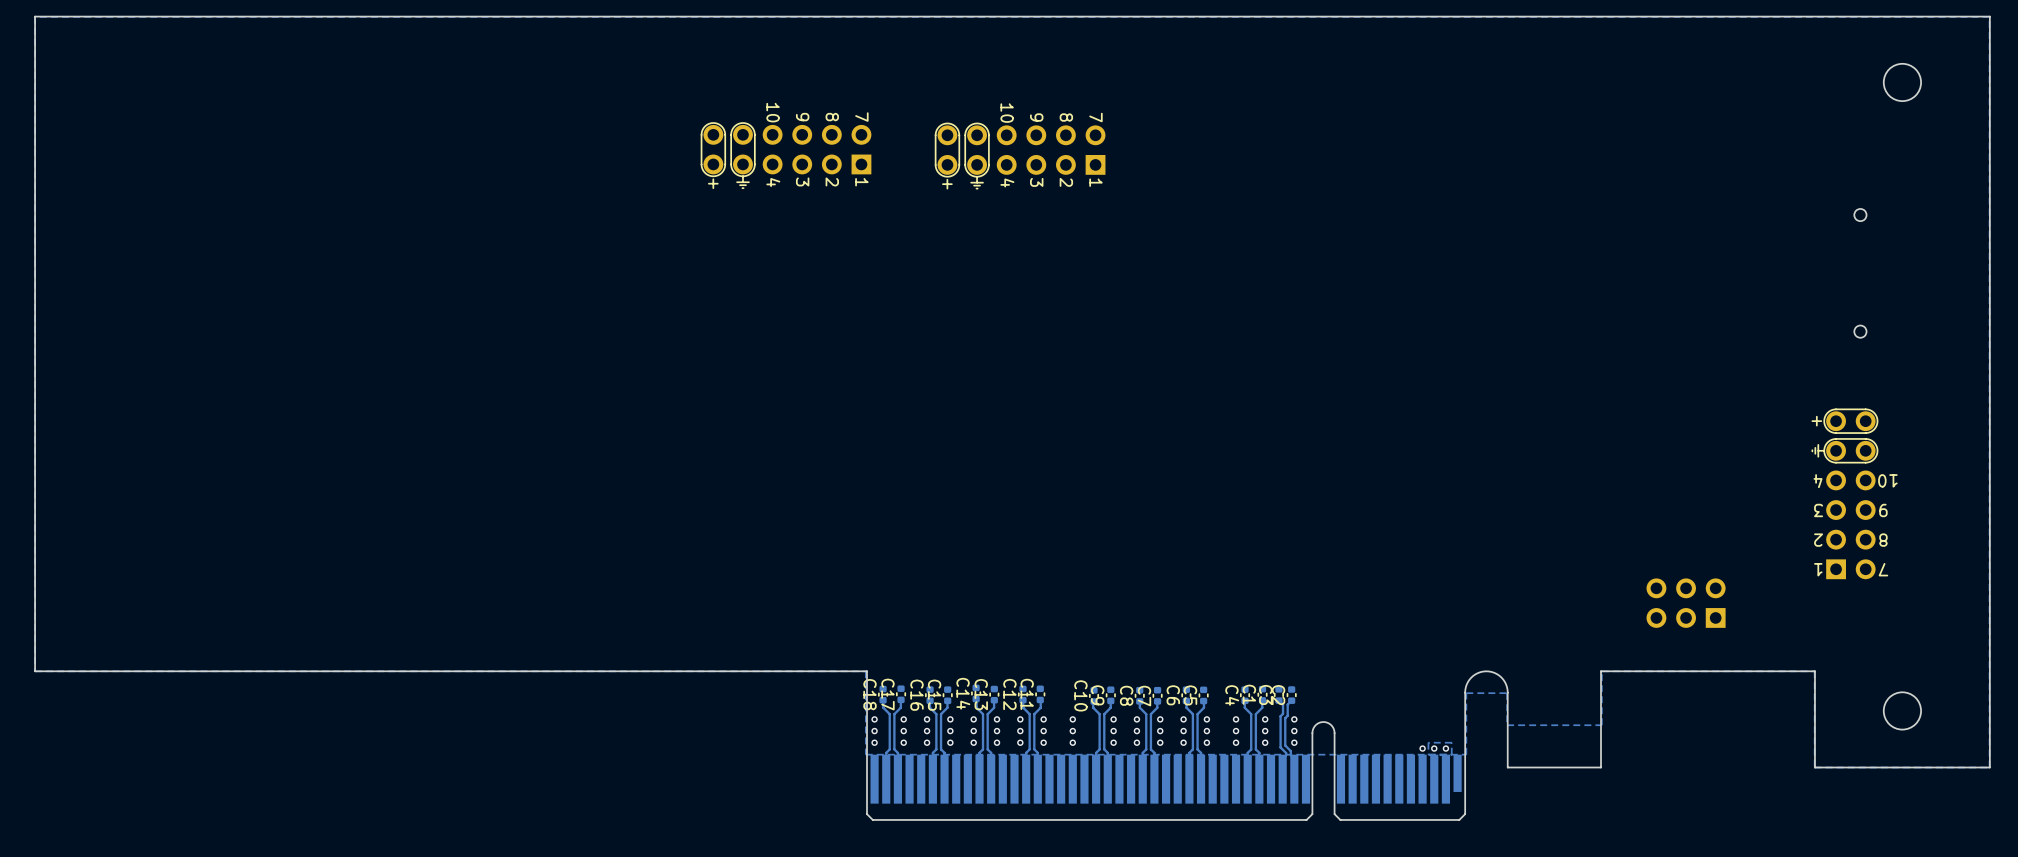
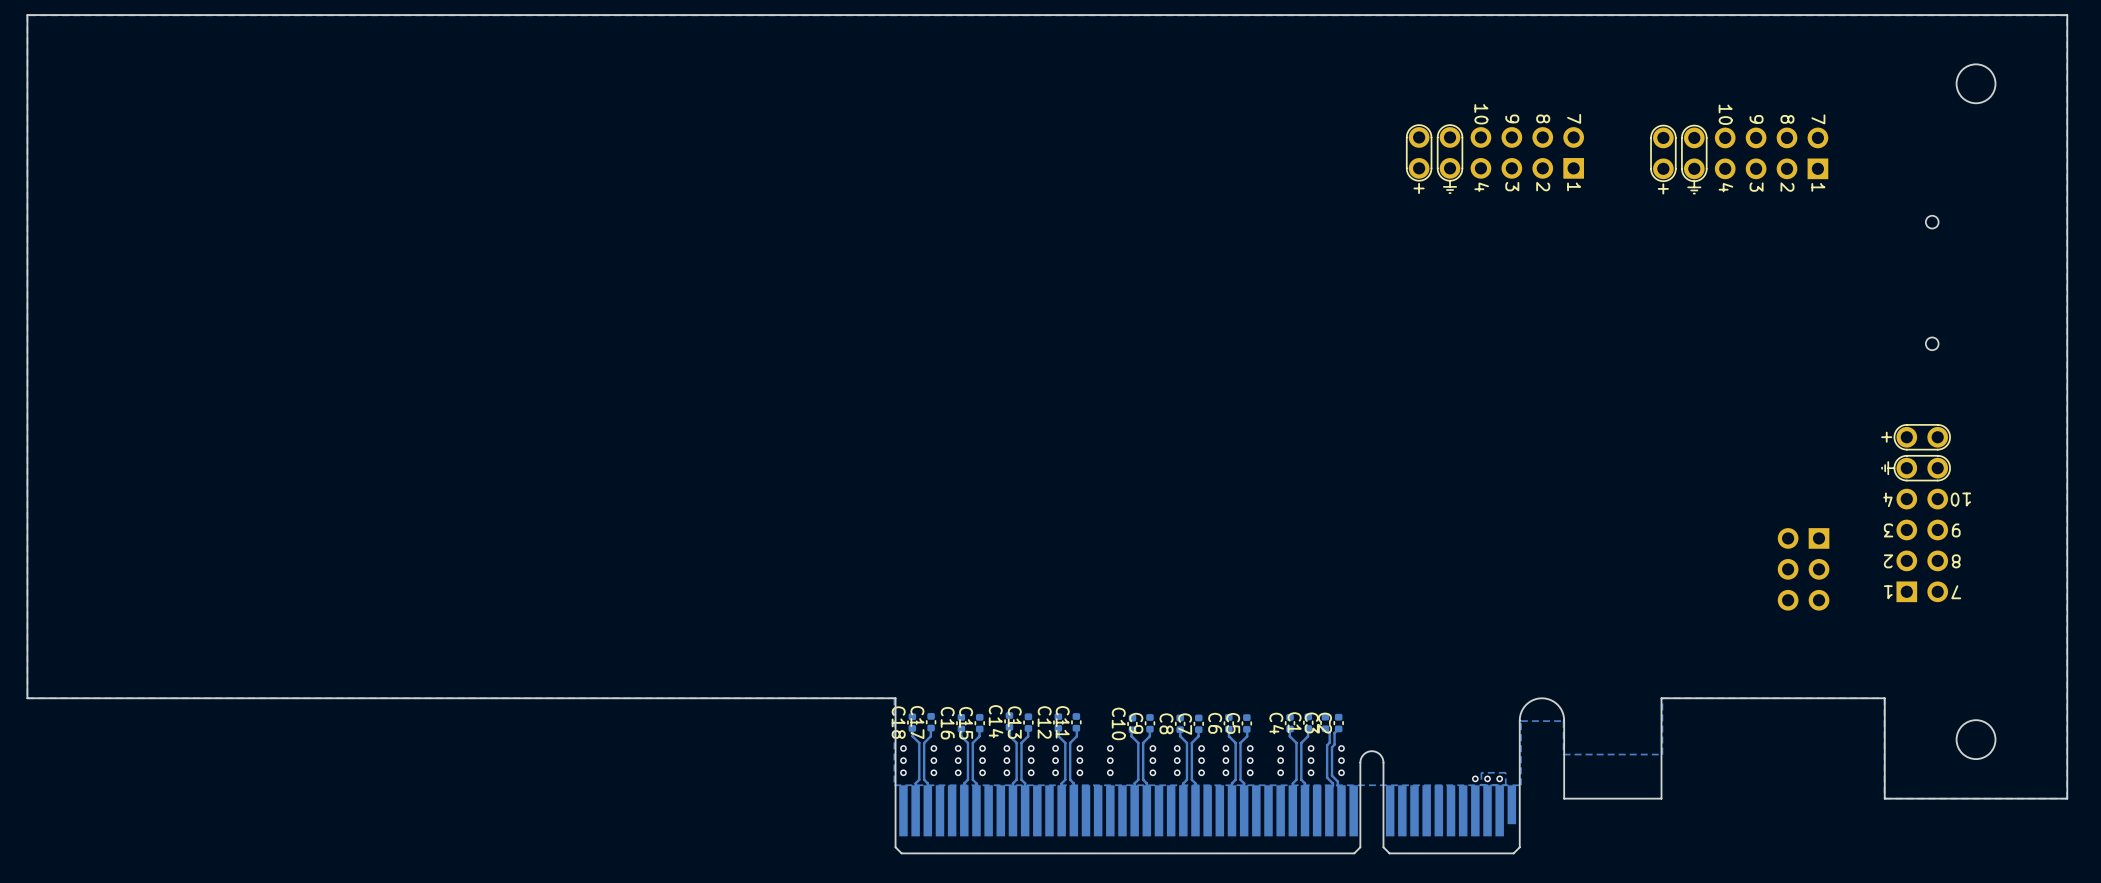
part: none -> (1495, 159)
part: (786, 155) -> none
part: none -> (1739, 159)
part: (1020, 156) -> none
part rotation: 0° (1686, 603) -> 90° counterclockwise (1803, 569)
part position: (1686, 603) -> (1803, 569)

